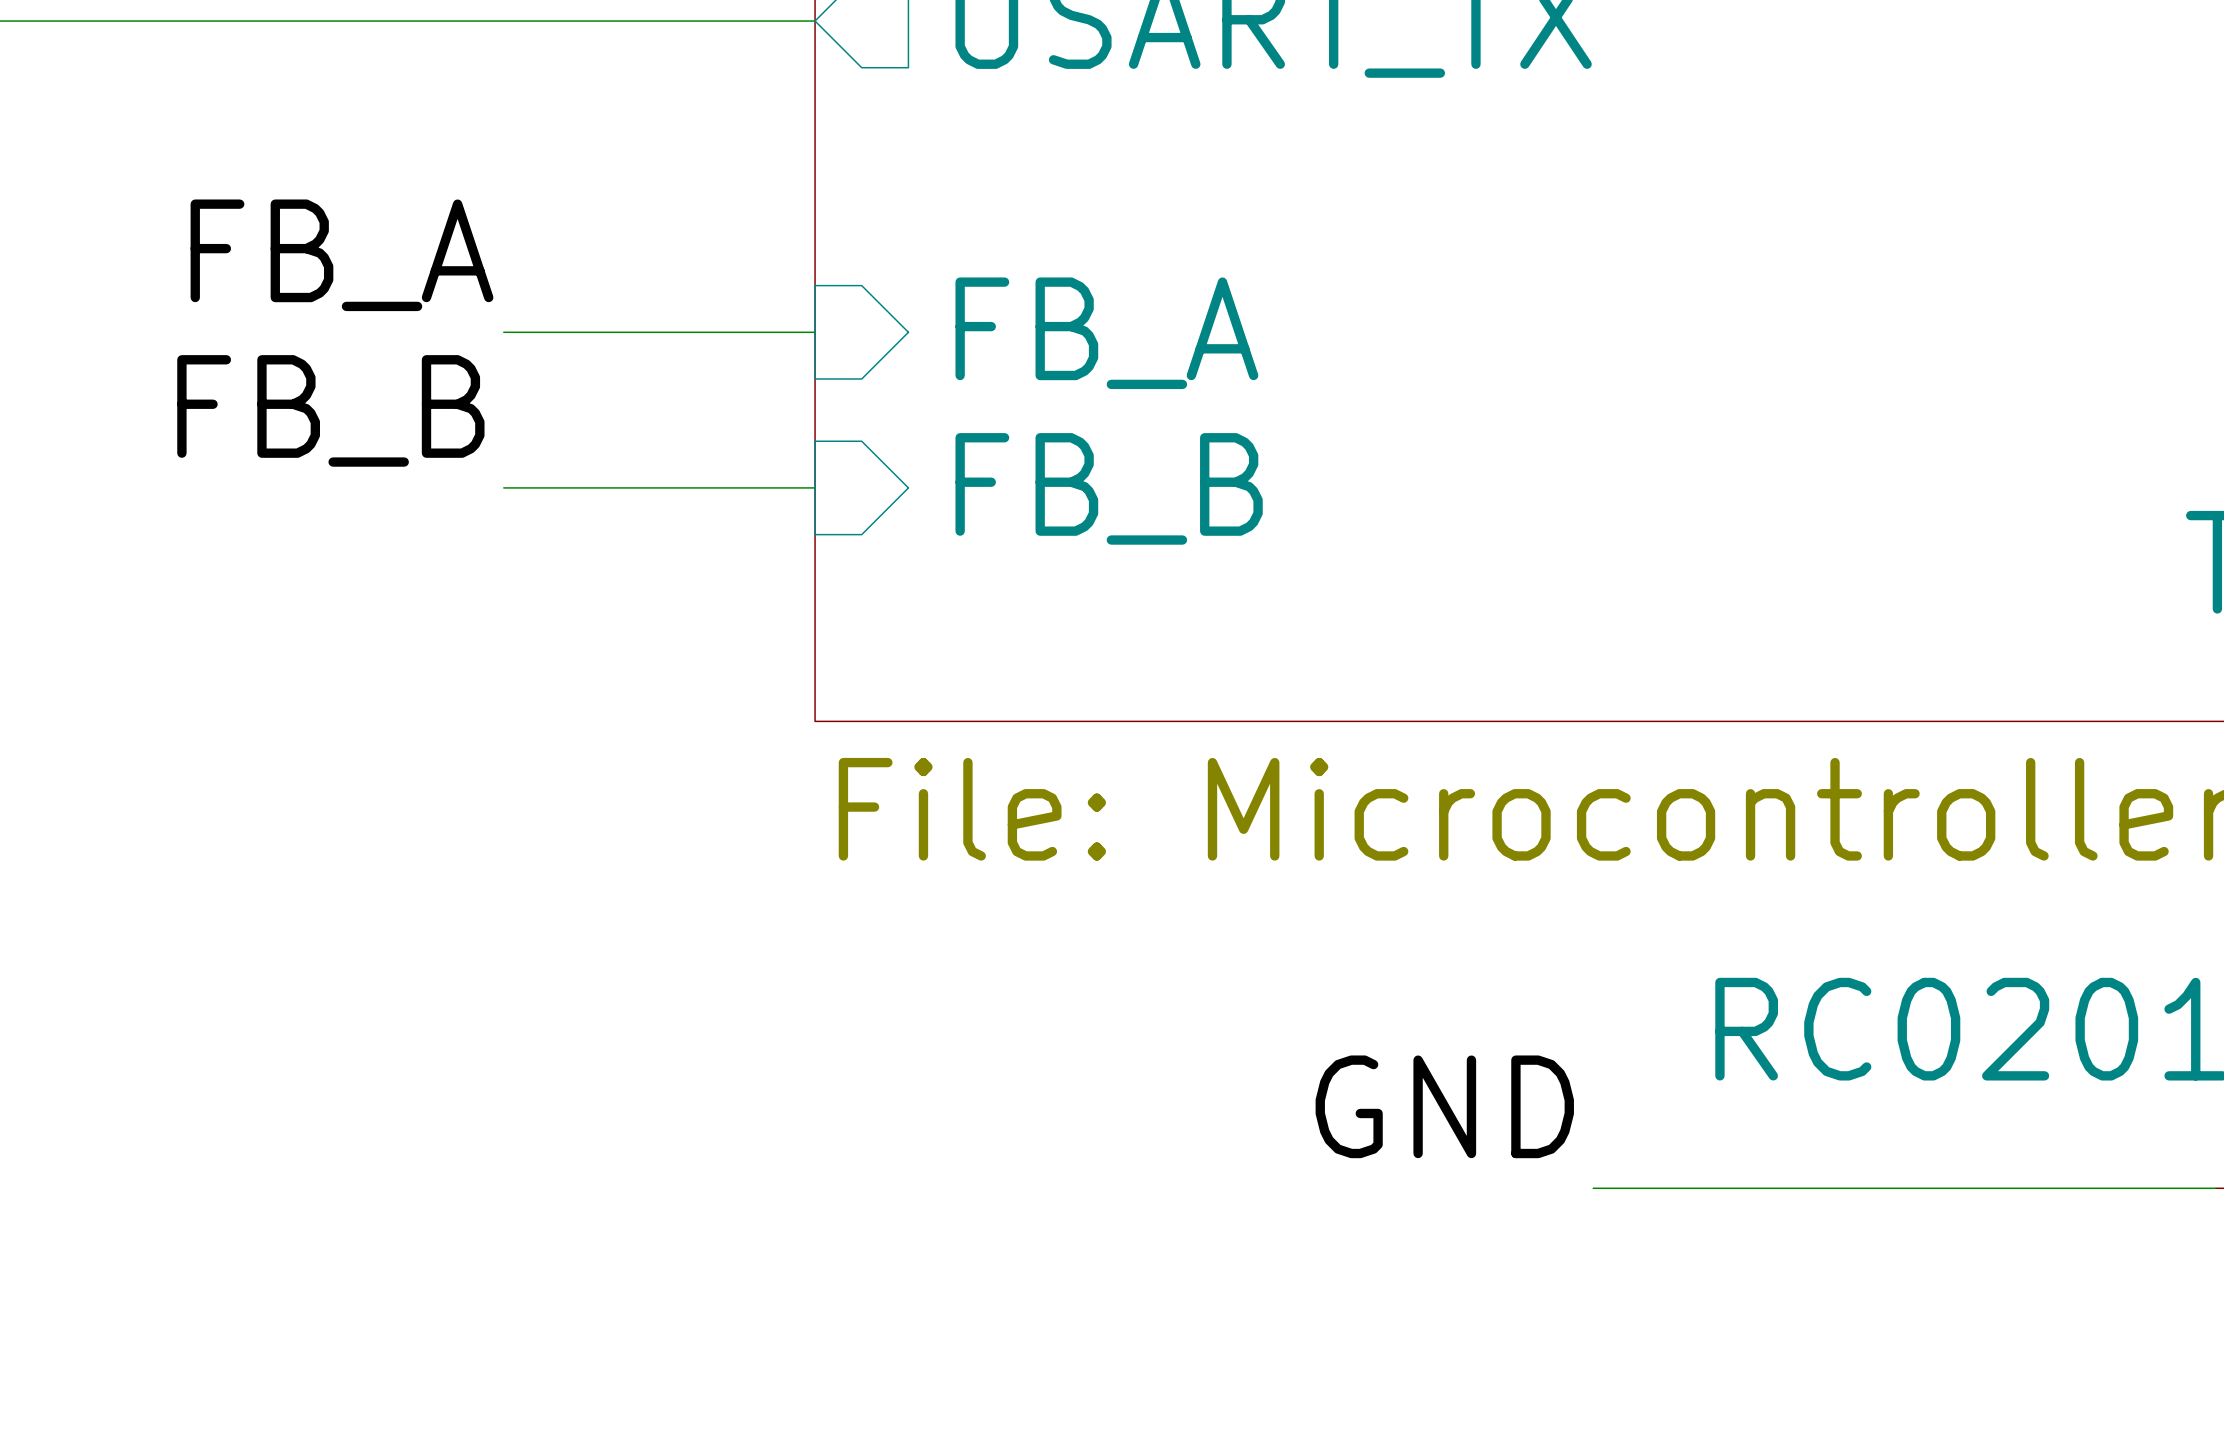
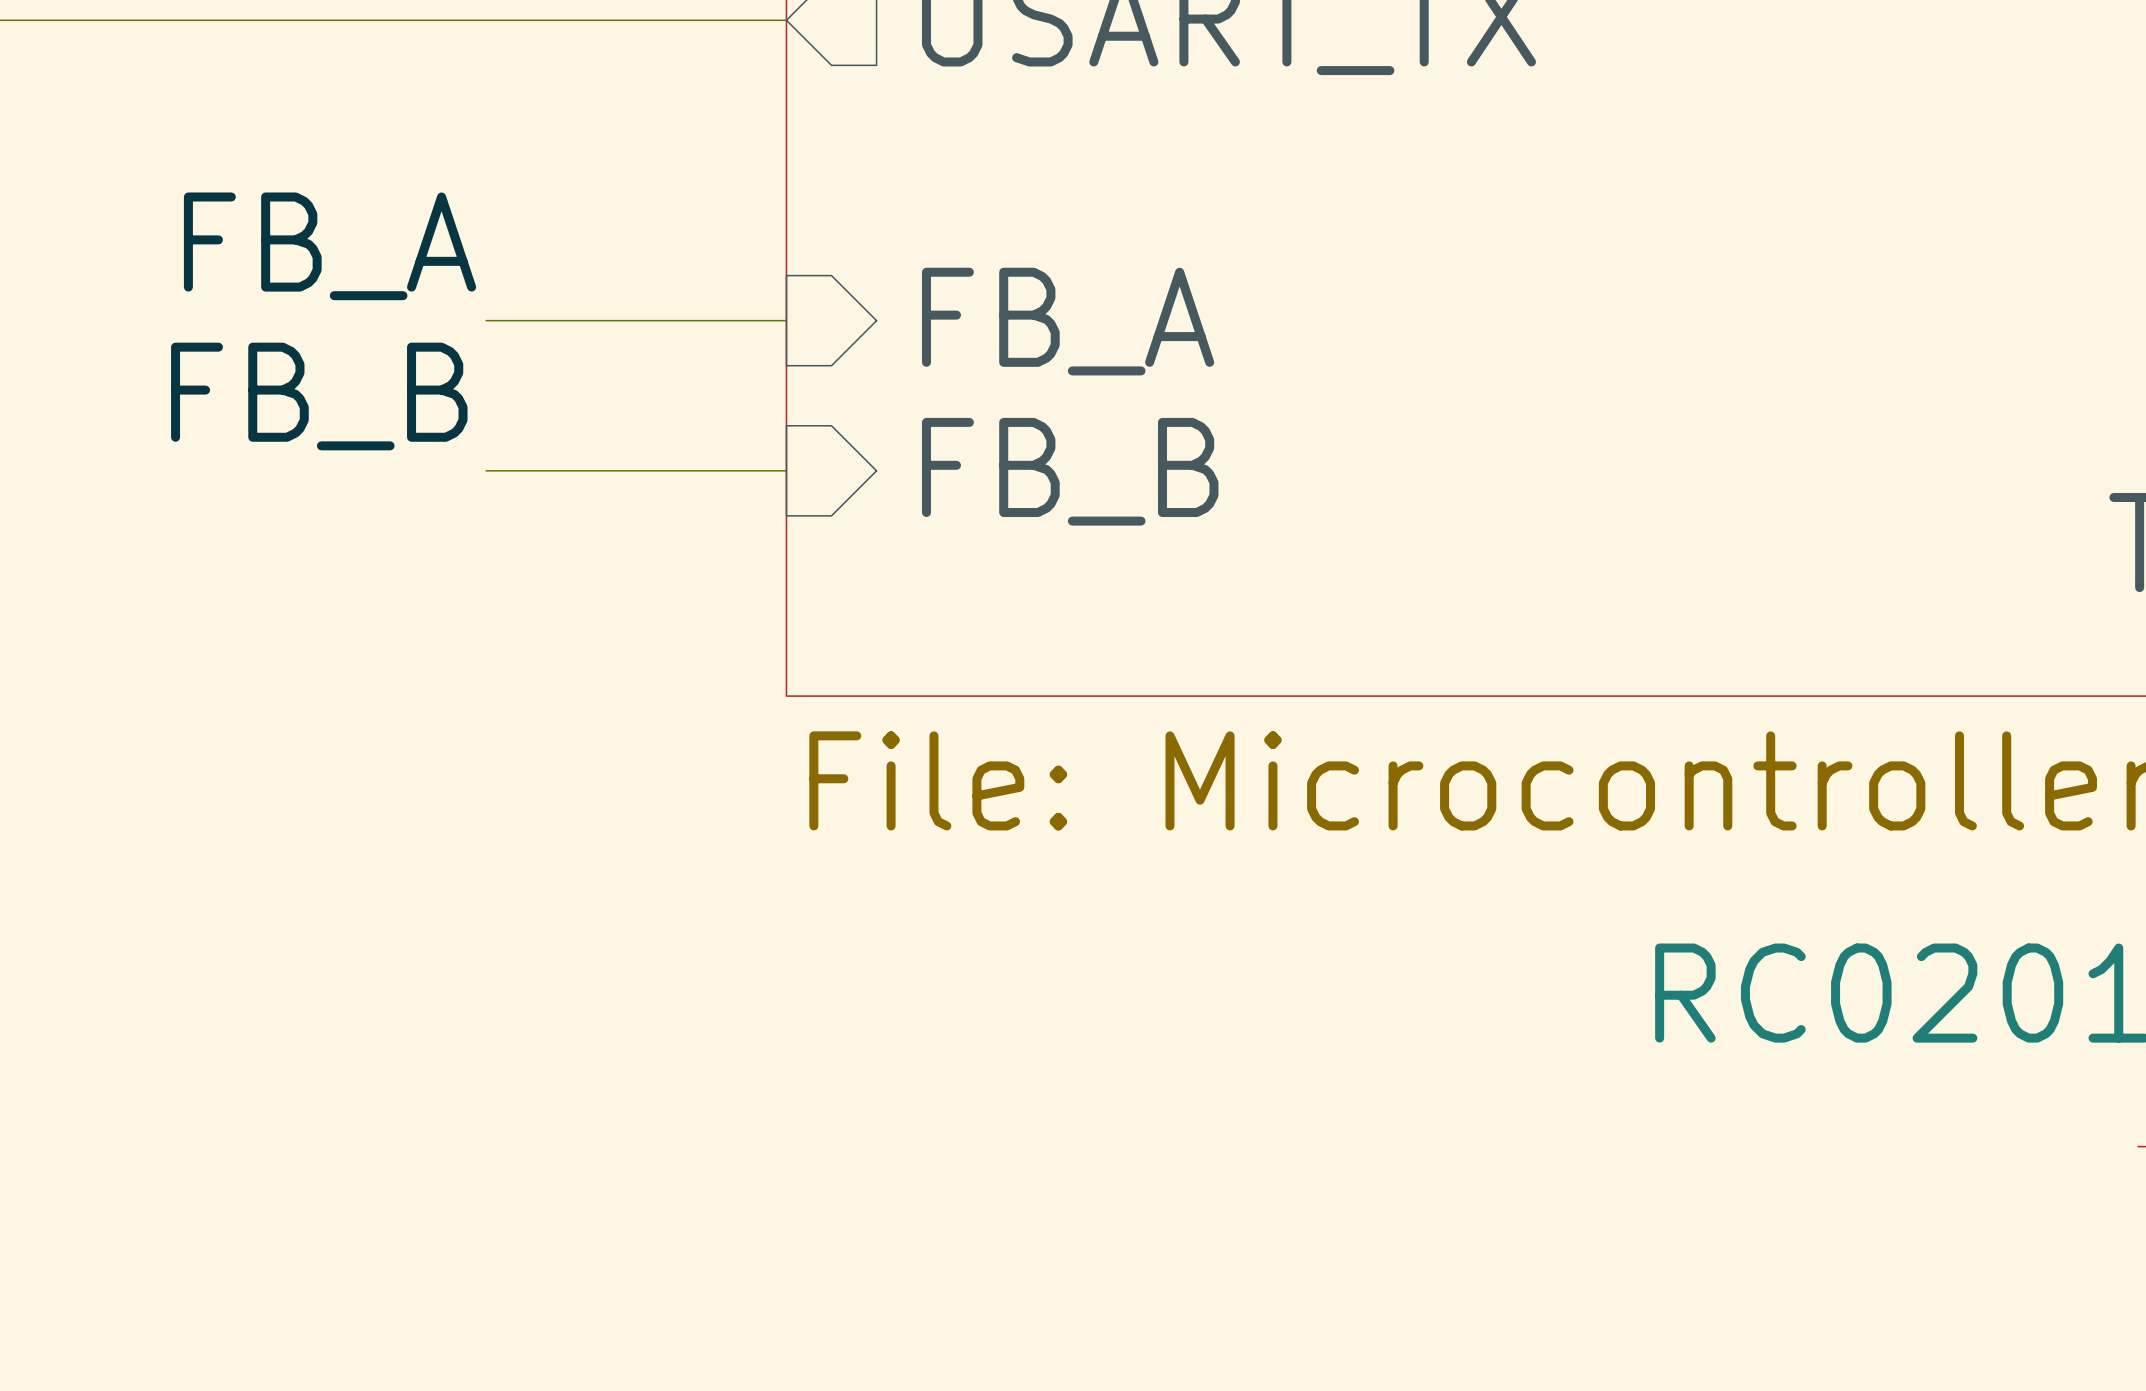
label: GND (1444, 1106) -> none
wire: (1593, 1188) (2215, 1188) -> none

